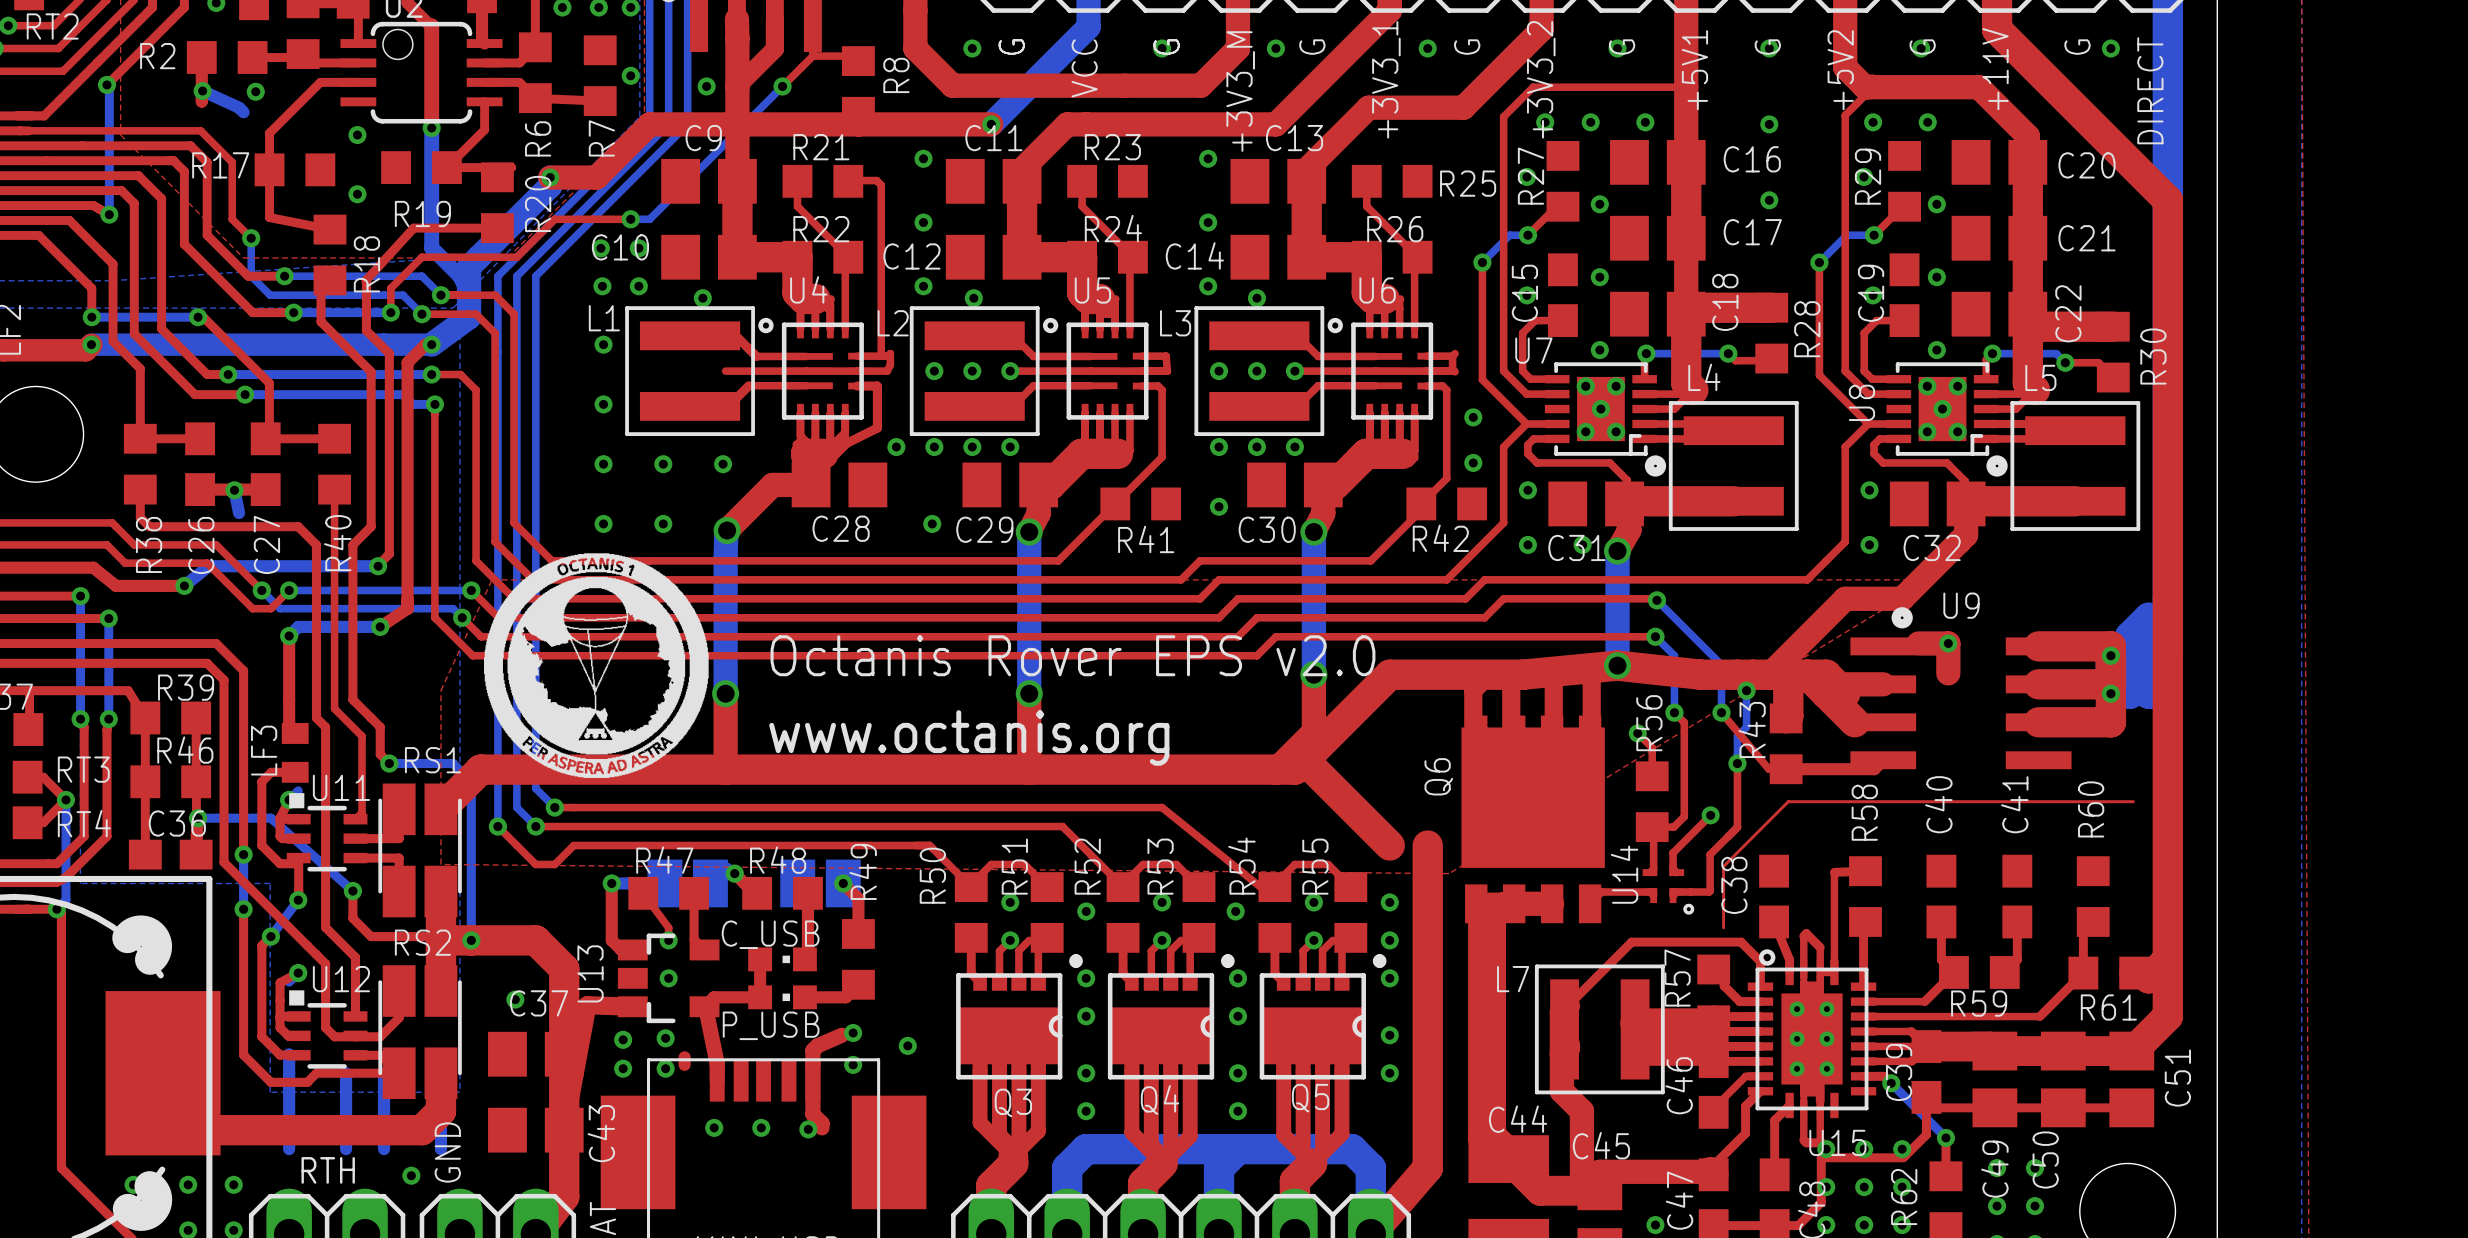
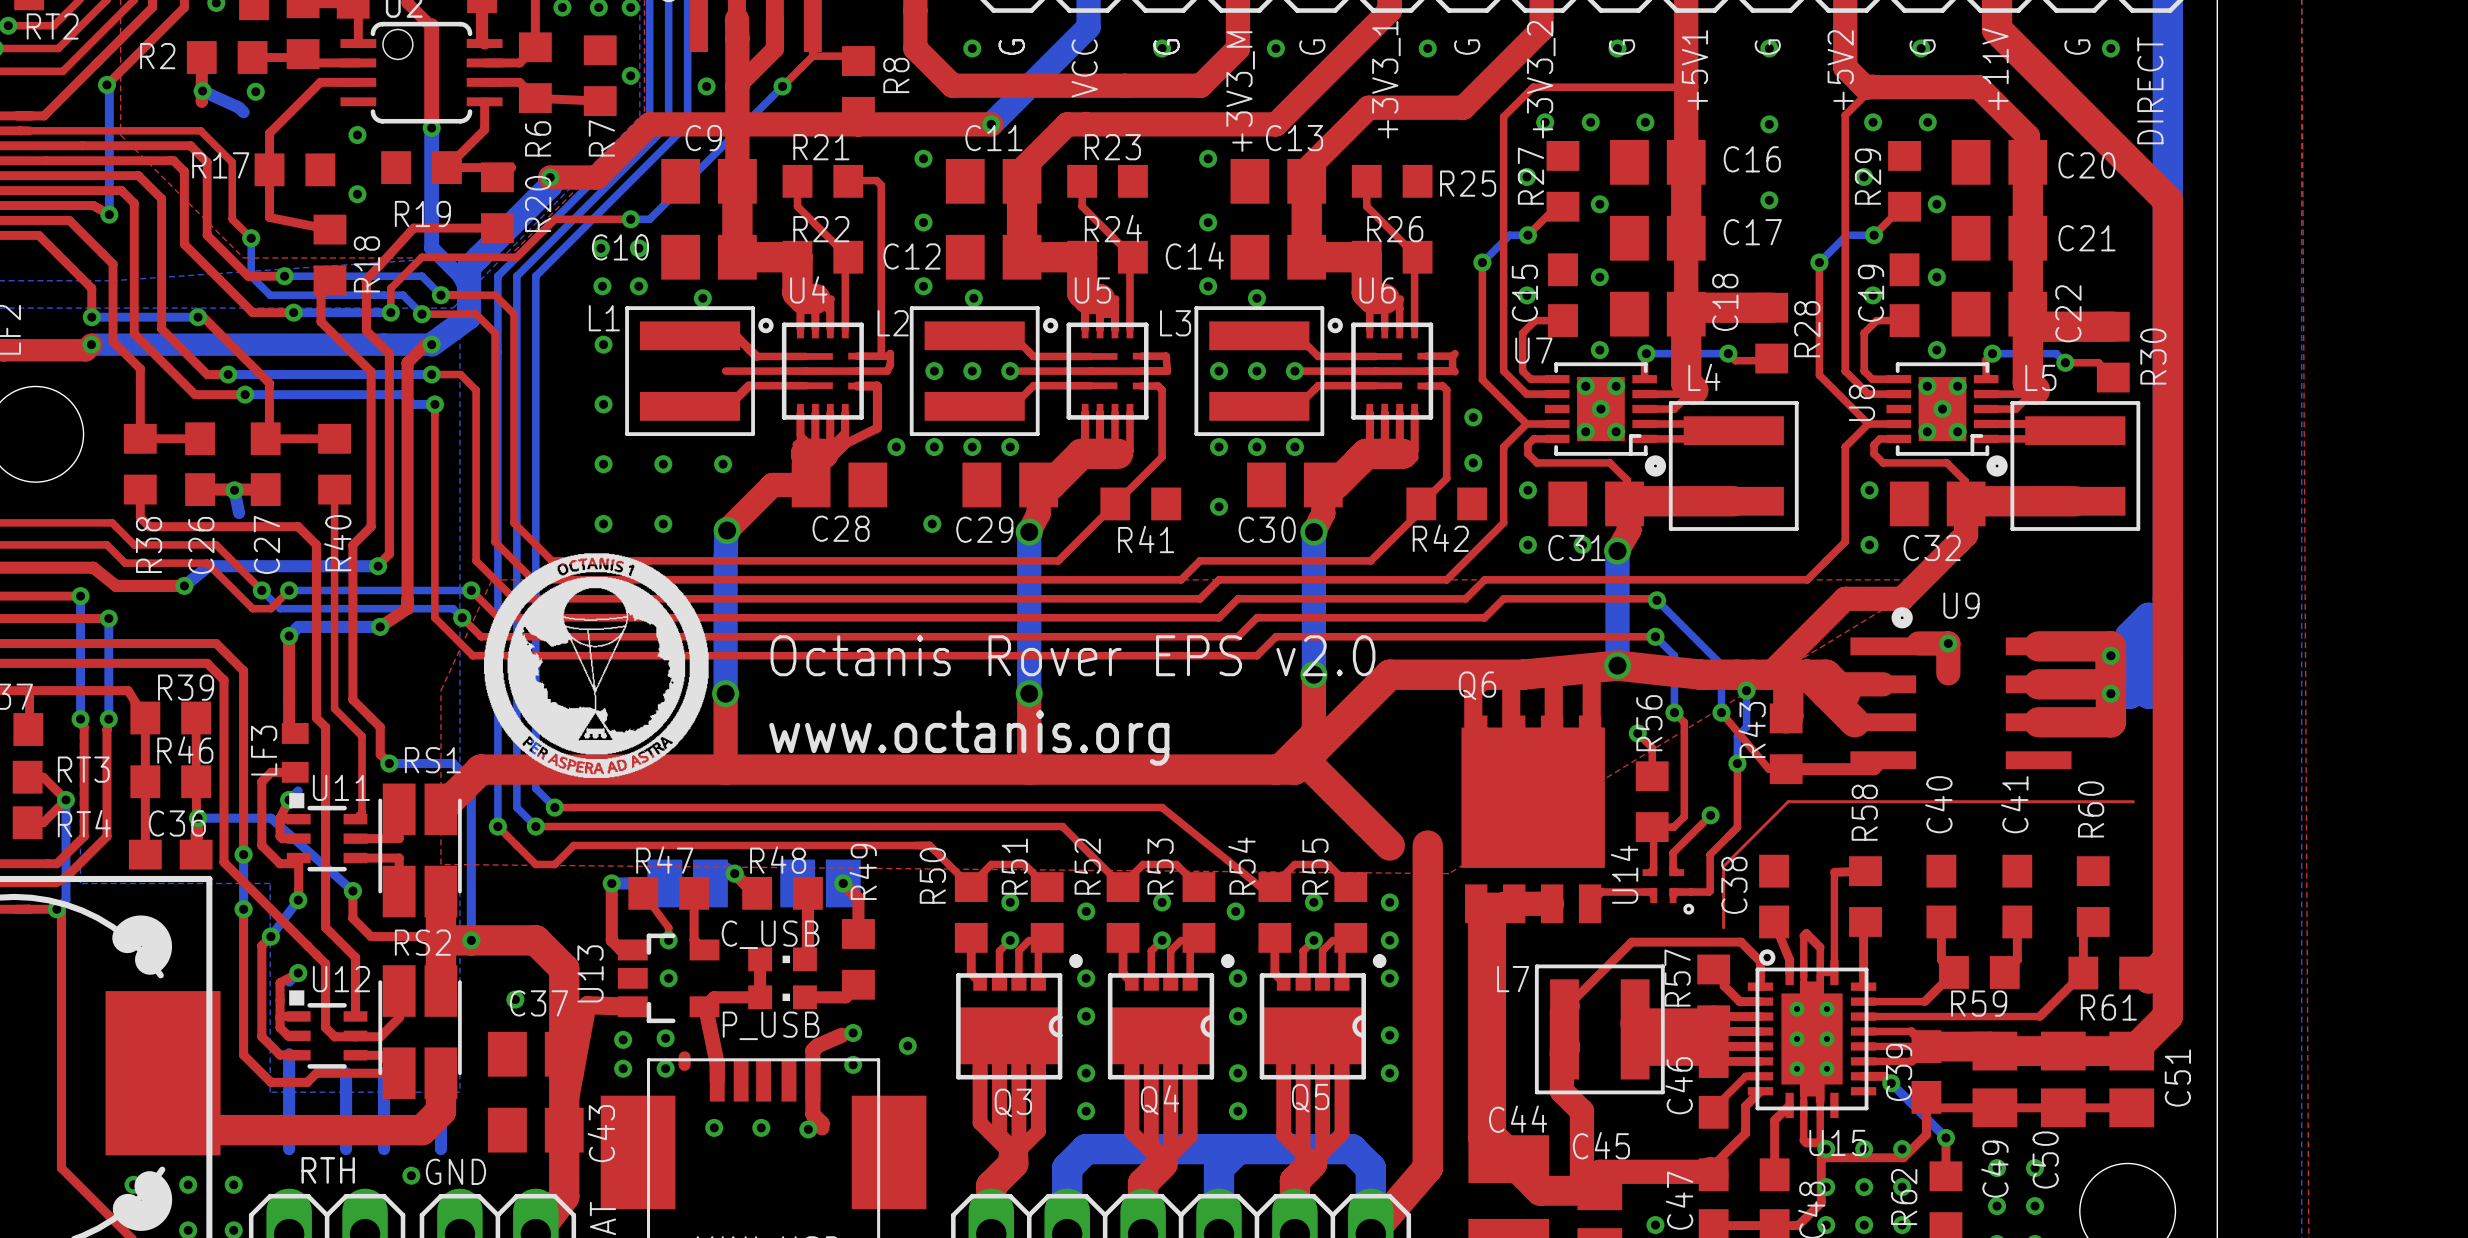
Q6 name rotation: 0° (1438, 776) -> 90° clockwise (1477, 685)
Q6 name position: Q6 (1438, 776) -> Q6 (1477, 685)
text rotation: 0° (447, 1152) -> 90° clockwise (455, 1171)

